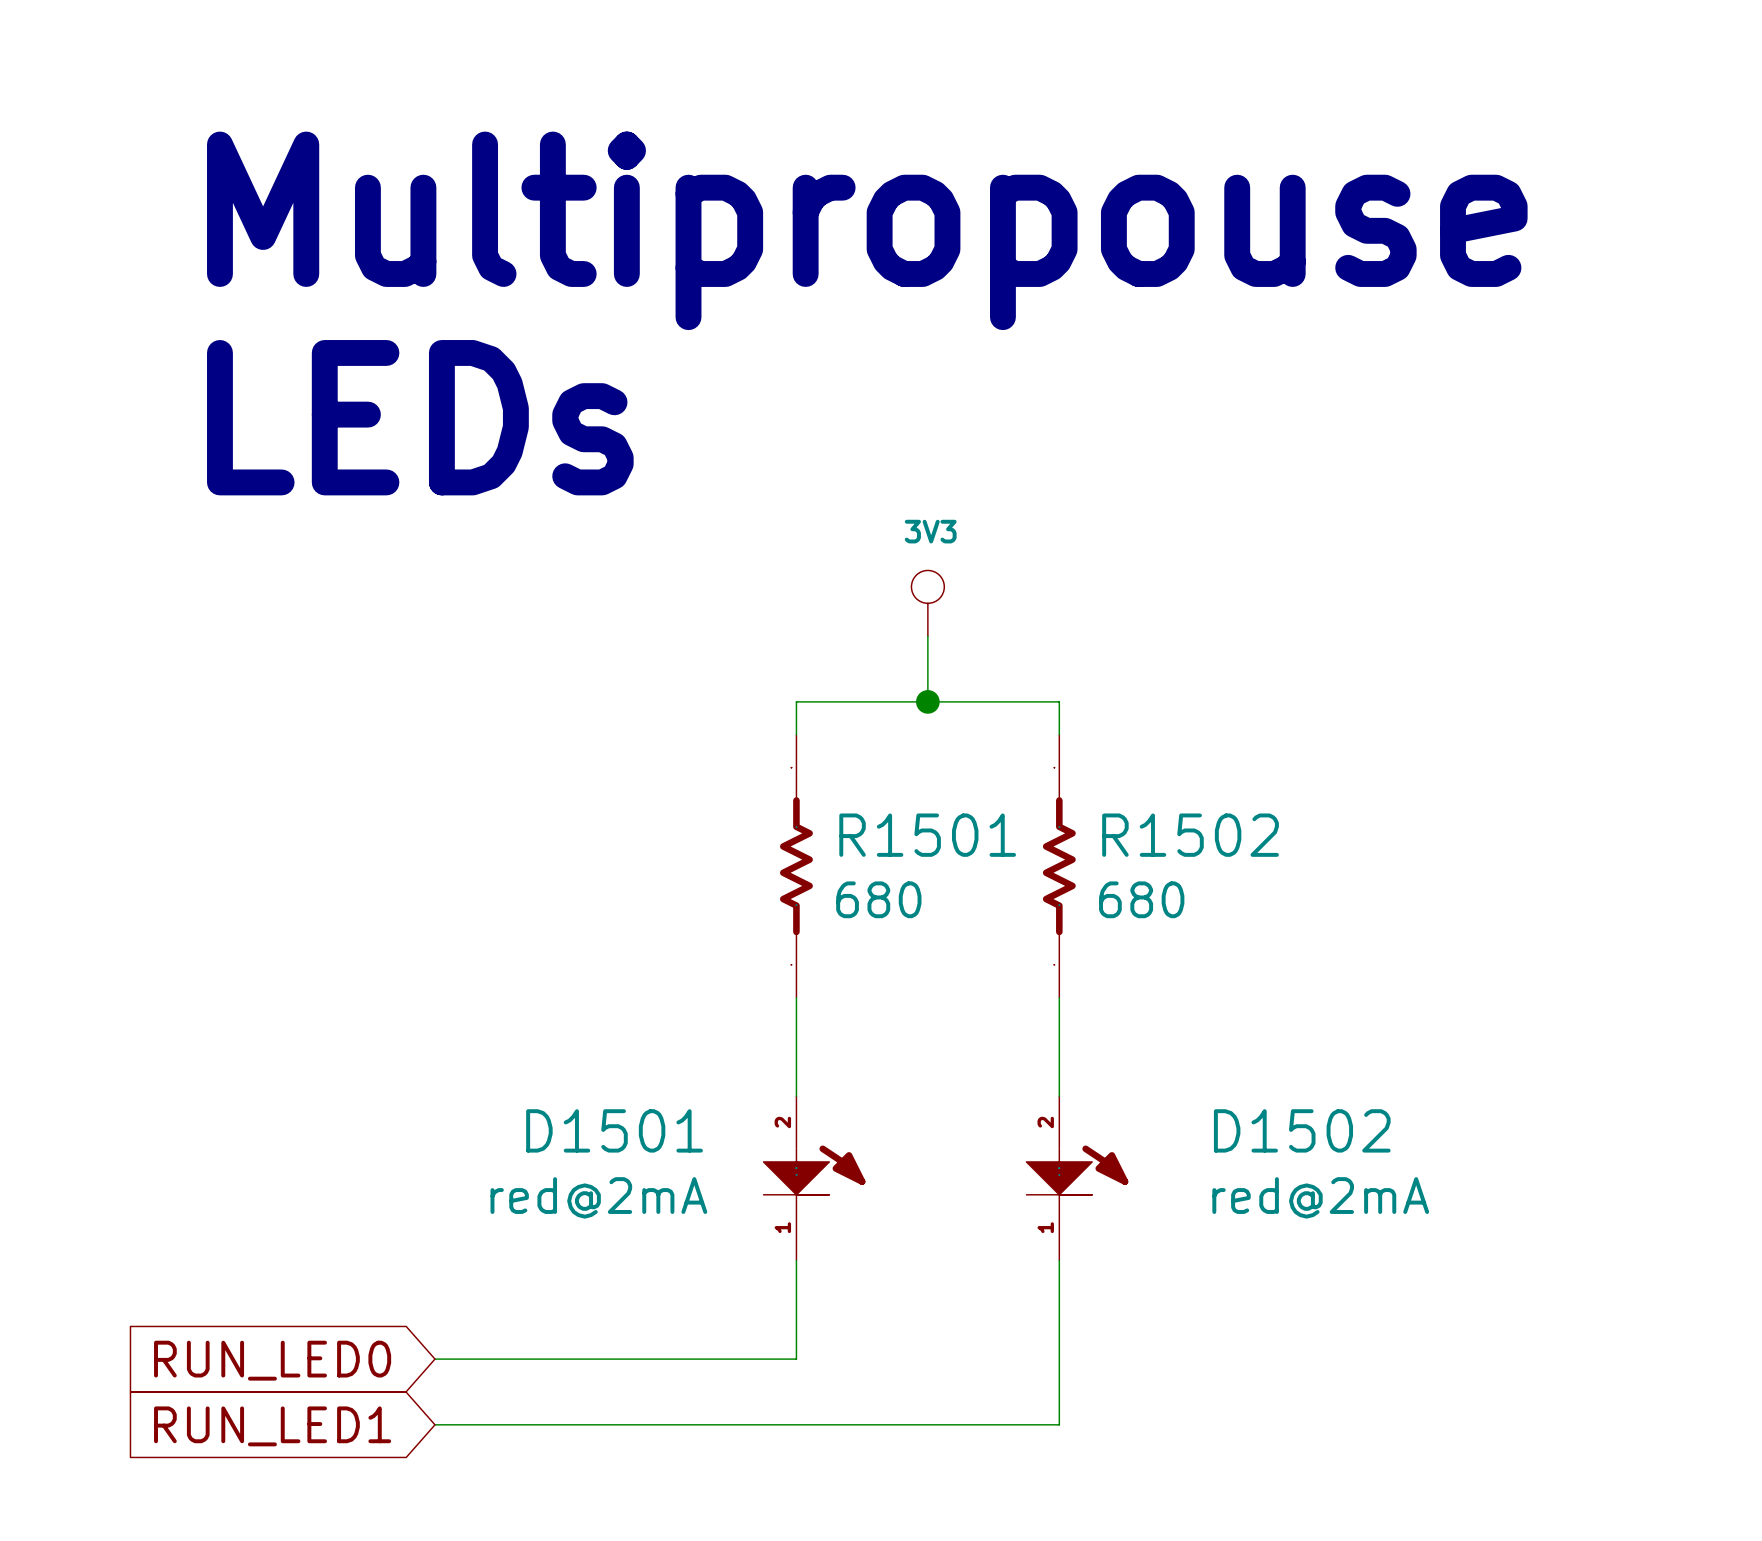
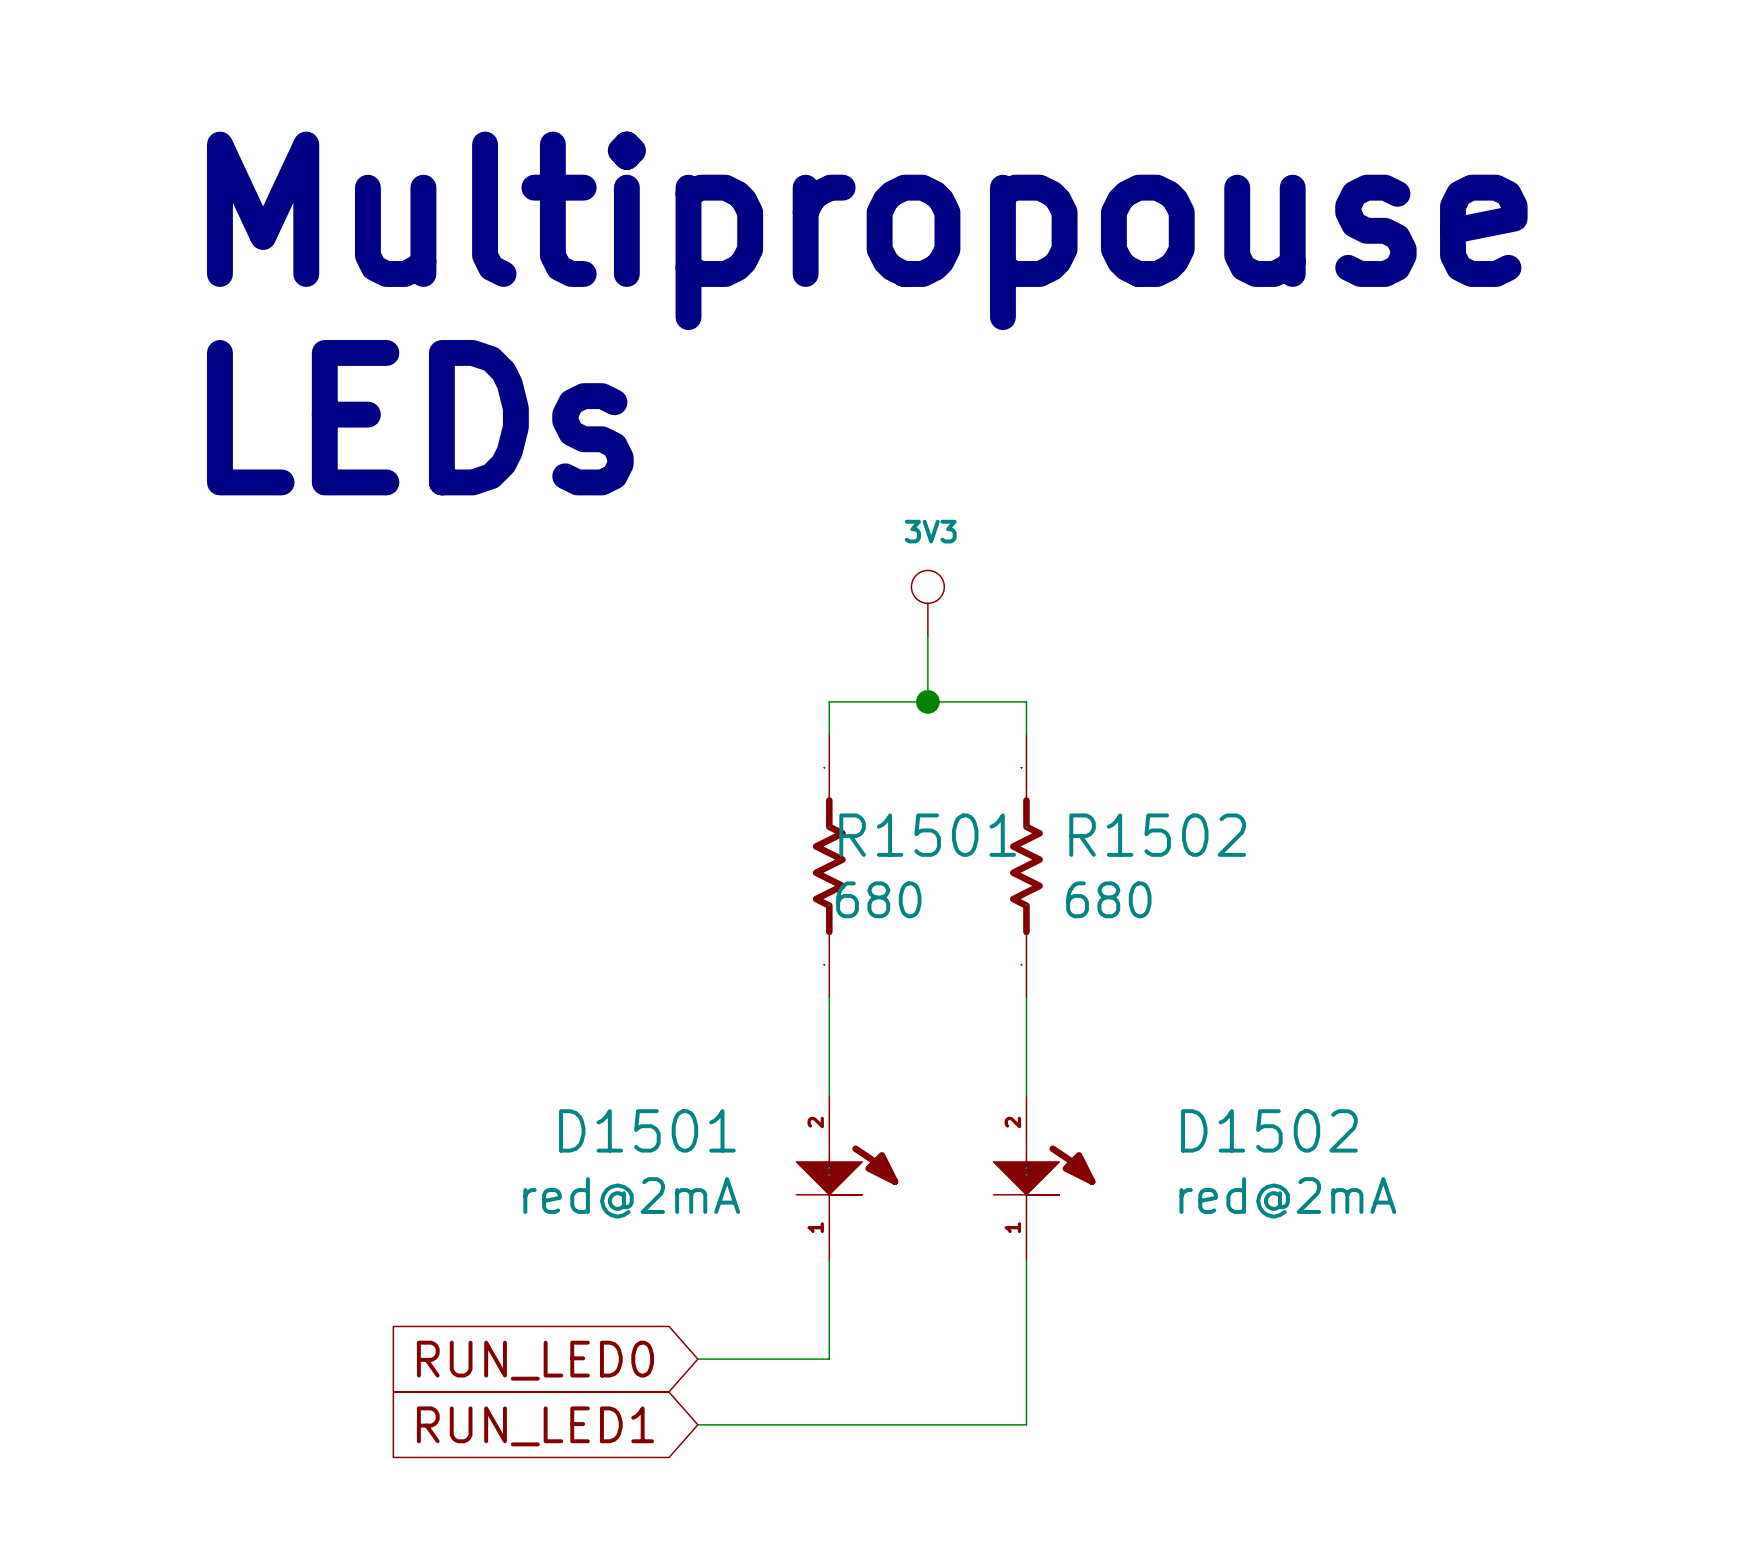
wire: (829, 701) (796, 701) (796, 734) -> (829, 701) (829, 734)
wire: (1026, 701) (1059, 701) (1059, 734) -> (1026, 701) (1026, 734)
R1501 position: (796, 866) -> (829, 866)
R1502 position: (1059, 866) -> (1026, 866)
wire: (796, 997) (796, 1096) -> (829, 997) (829, 1096)
wire: (1059, 997) (1059, 1096) -> (1026, 997) (1026, 1096)
D1501 position: (814, 1178) -> (847, 1178)
D1502 position: (1077, 1178) -> (1044, 1178)
wire: (796, 1260) (796, 1359) -> (829, 1260) (829, 1359) (796, 1359)
wire: (1059, 1260) (1059, 1424) (1026, 1424) -> (1026, 1260) (1026, 1424)
wire: (434, 1359) (697, 1359) -> none
global label position: RUN_LED0 (272, 1360) -> RUN_LED0 (535, 1360)
wire: (434, 1424) (697, 1424) -> none
global label position: RUN_LED1 (272, 1426) -> RUN_LED1 (535, 1426)

